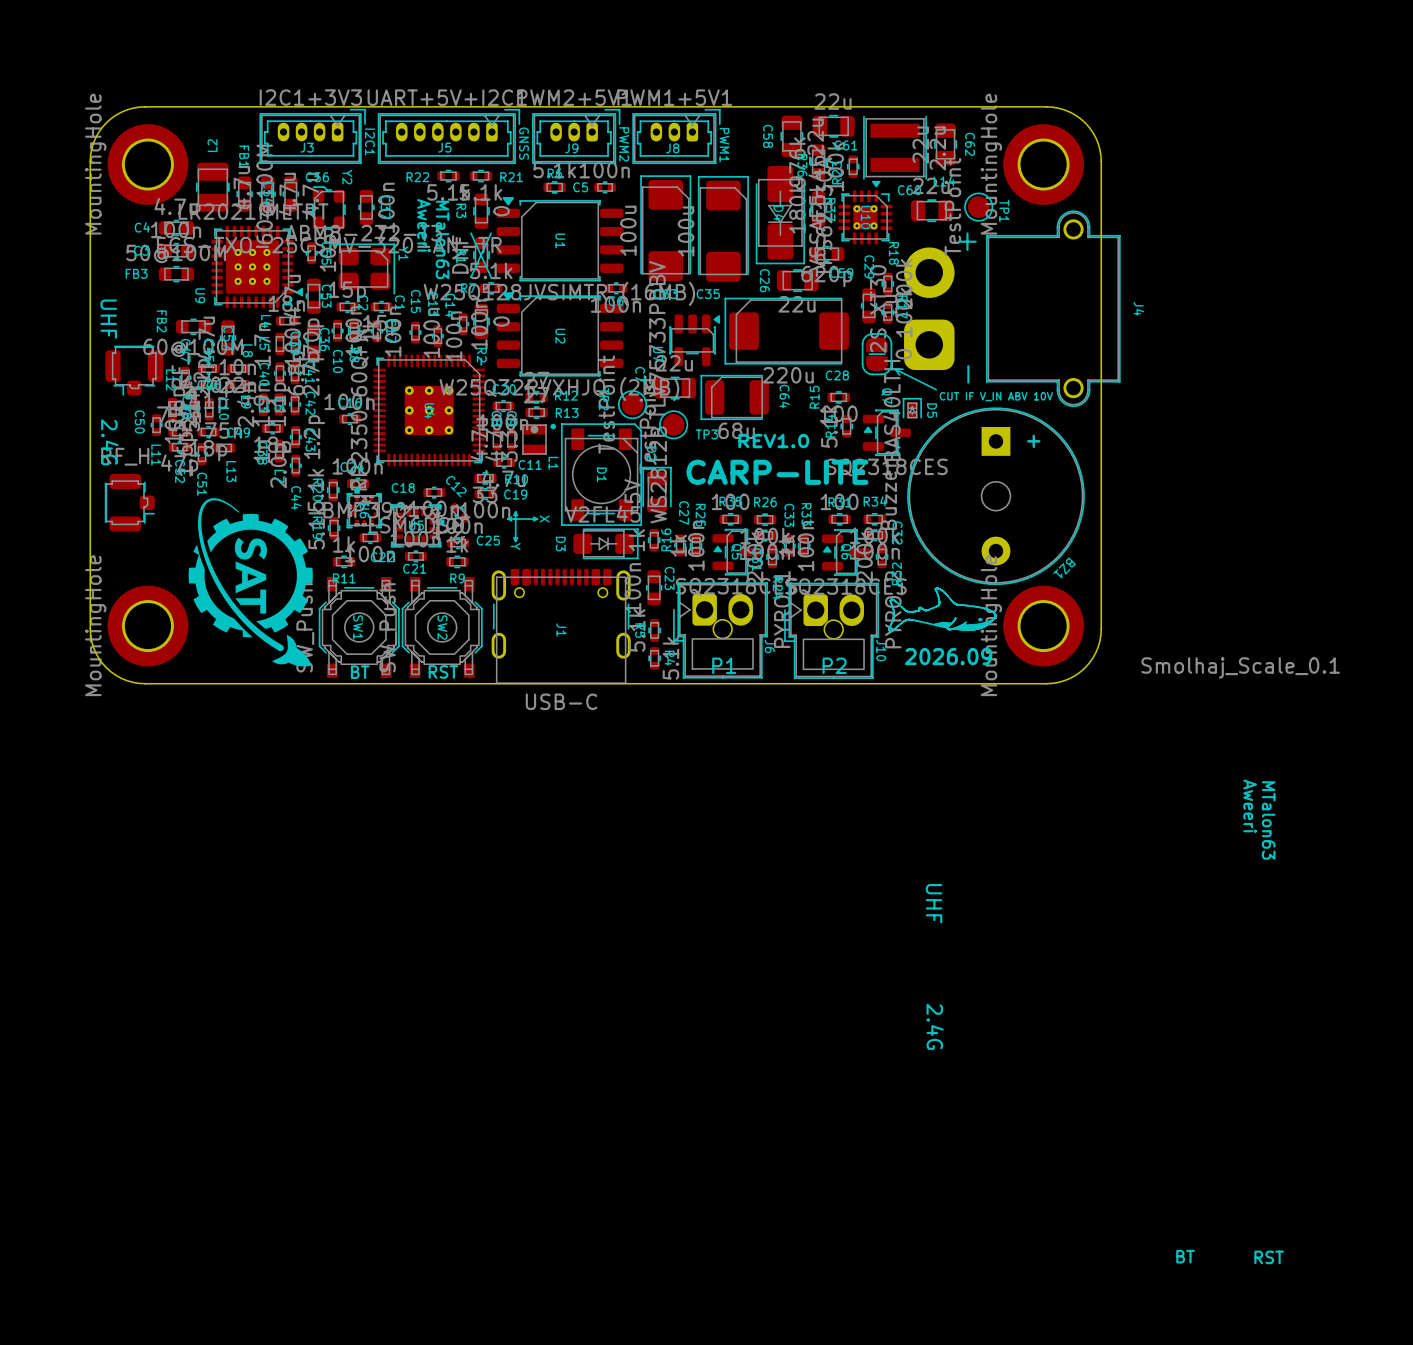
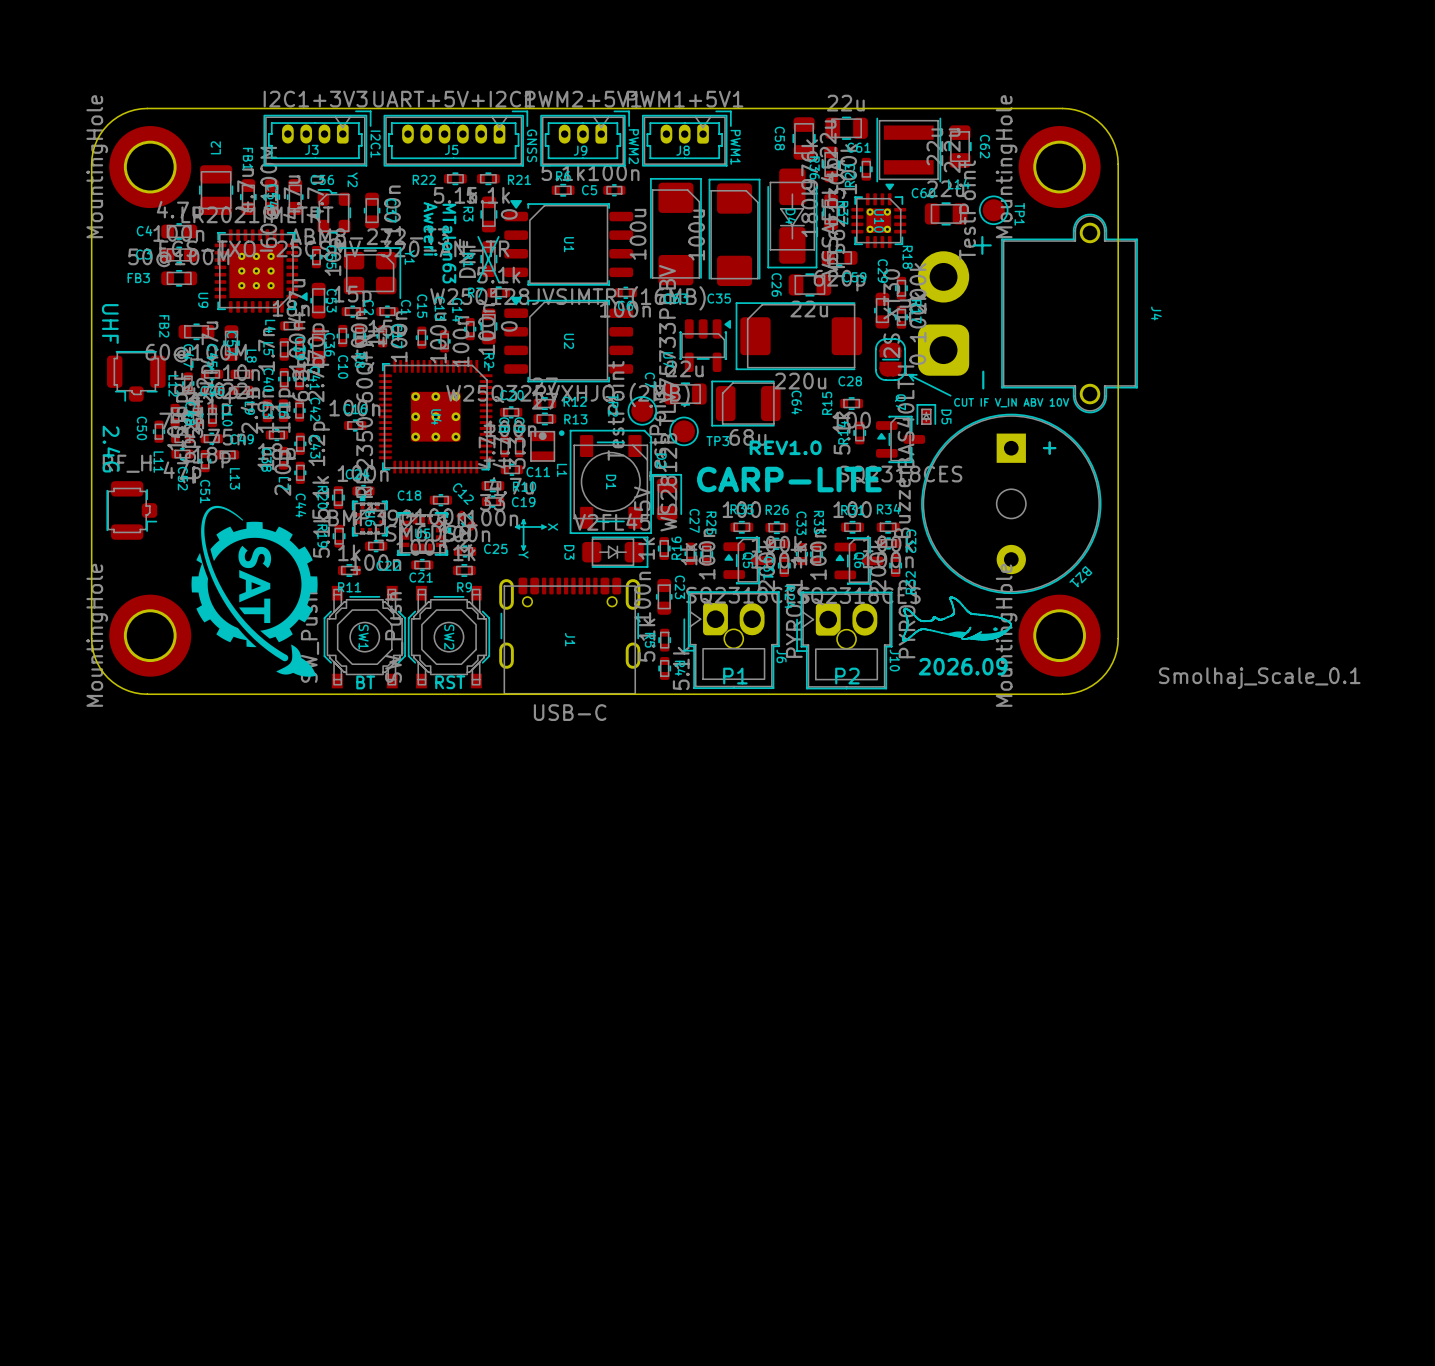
text: Aweeri (1250, 806) -> none
text: MTalon63 (1268, 820) -> none
text: UHF (934, 903) -> none
text: 2.4G (935, 1026) -> none
text: BT (1185, 1256) -> none
text: RST (1269, 1257) -> none

